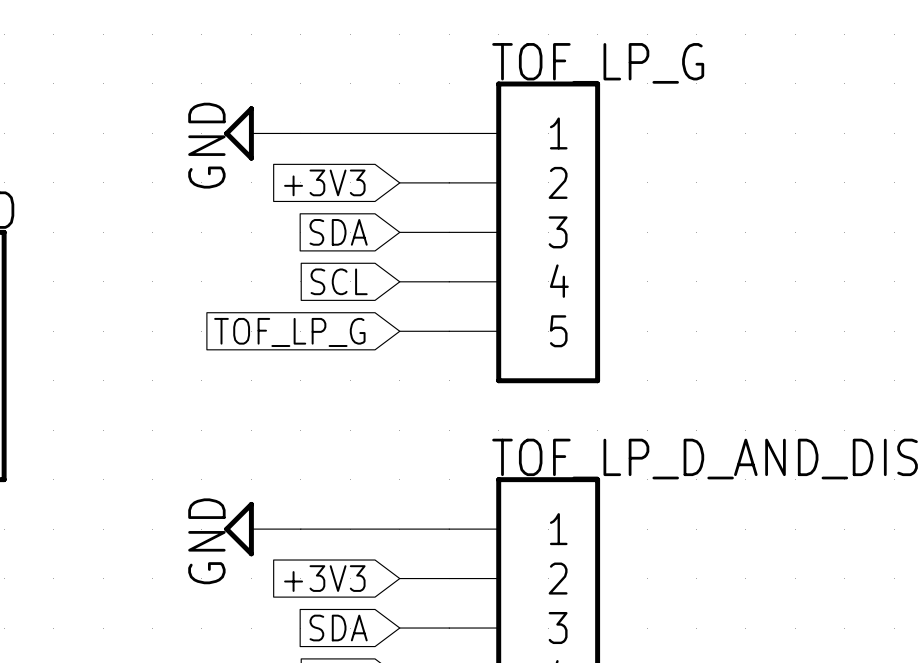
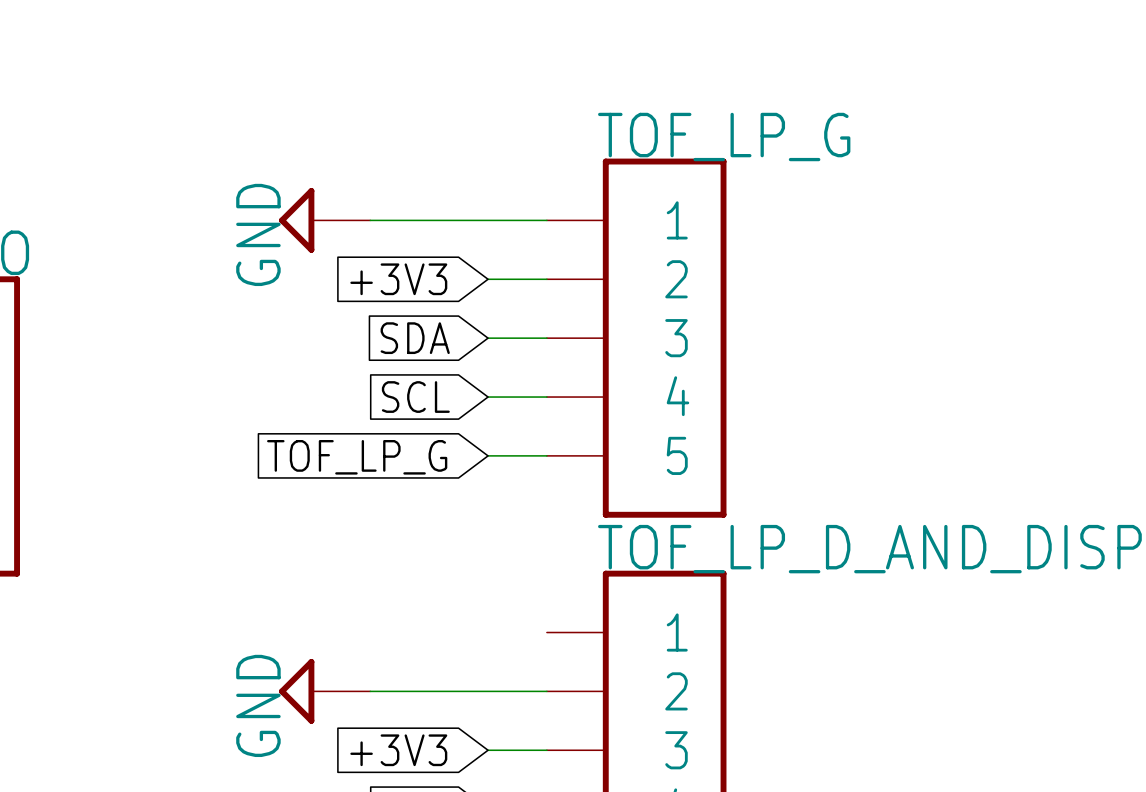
power symbol position: GND (262, 133) -> GND (324, 220)
wire: (300, 133) (449, 133) -> none
wire: none -> (370, 220) (488, 220)
global label: +3V3 (324, 182) -> none
global label: SDA (338, 232) -> +3V3 (398, 279)
TOF_LP_G position: (524, 232) -> (636, 338)
global label: SCL (339, 281) -> SDA (415, 338)
global label: TOF_LP_G (289, 332) -> SCL (415, 397)
wire: none -> (488, 455) (546, 455)
global label: none -> TOF_LP_G (357, 457)
power symbol position: GND (262, 529) -> GND (324, 691)
wire: (300, 529) (449, 529) -> none
wire: none -> (370, 691) (488, 691)
global label: +3V3 (324, 578) -> none
global label: SDA (338, 628) -> +3V3 (398, 750)

